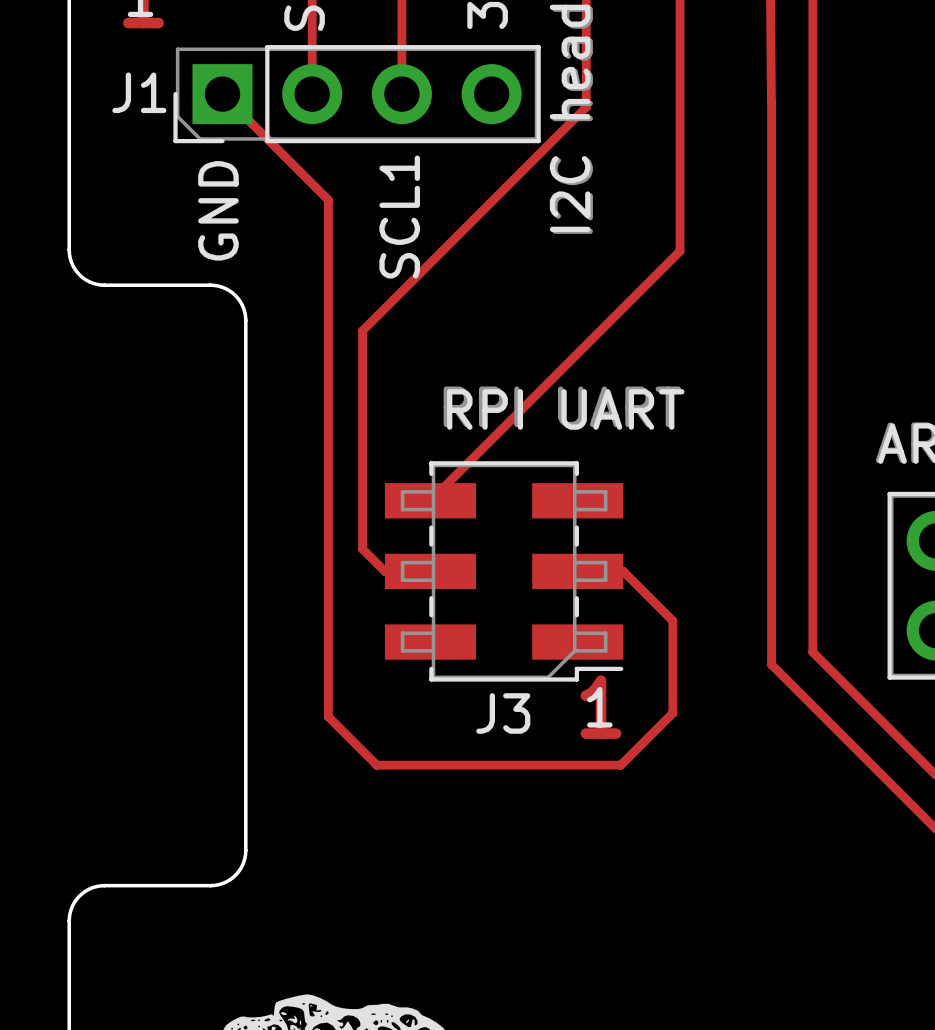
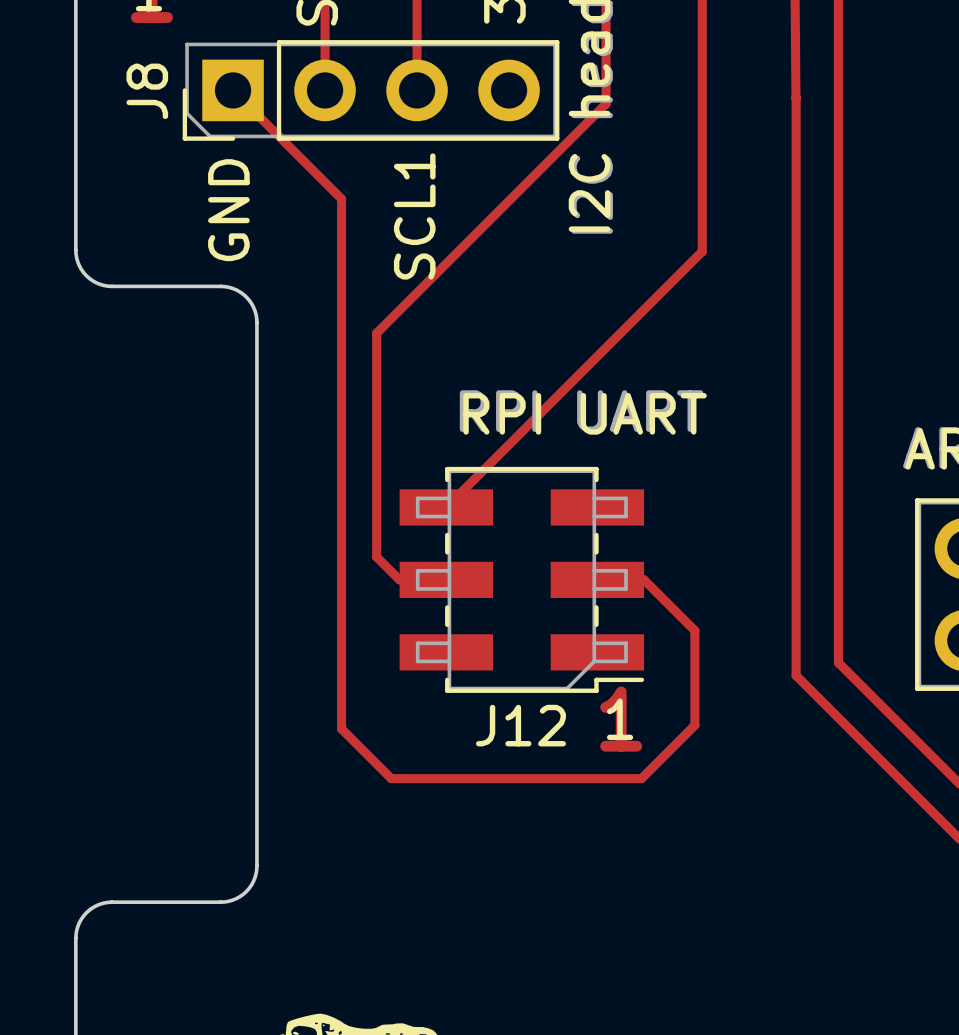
J1 name: J1 (139, 92) -> J8 (147, 91)
J3 name: J3 (503, 713) -> J12 (520, 725)

